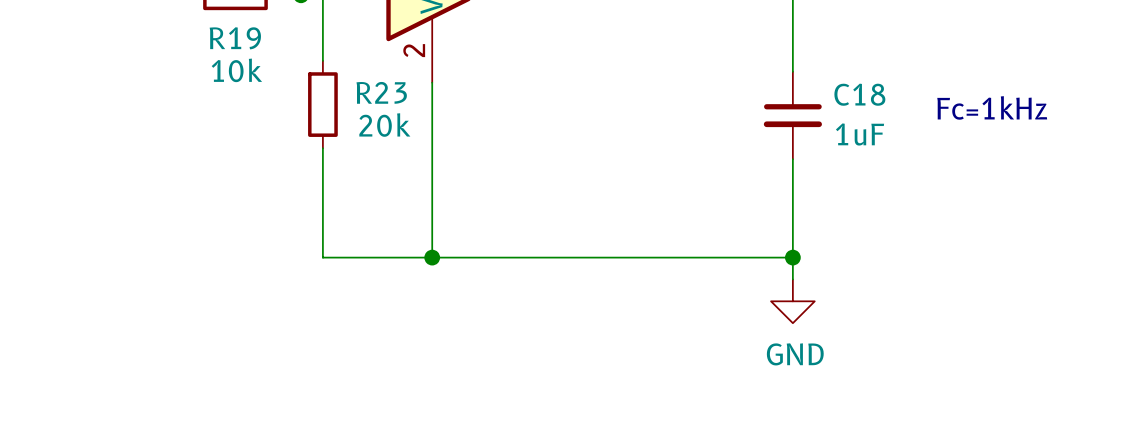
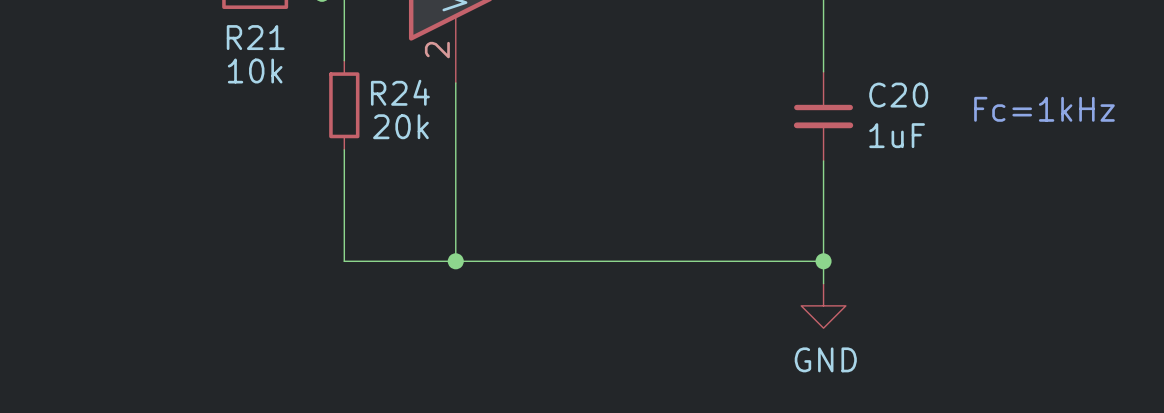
R19 name: R19 (235, 38) -> R21 (255, 37)
R23 name: R23 (381, 92) -> R24 (400, 92)
C18 name: C18 (859, 94) -> C20 (898, 95)

